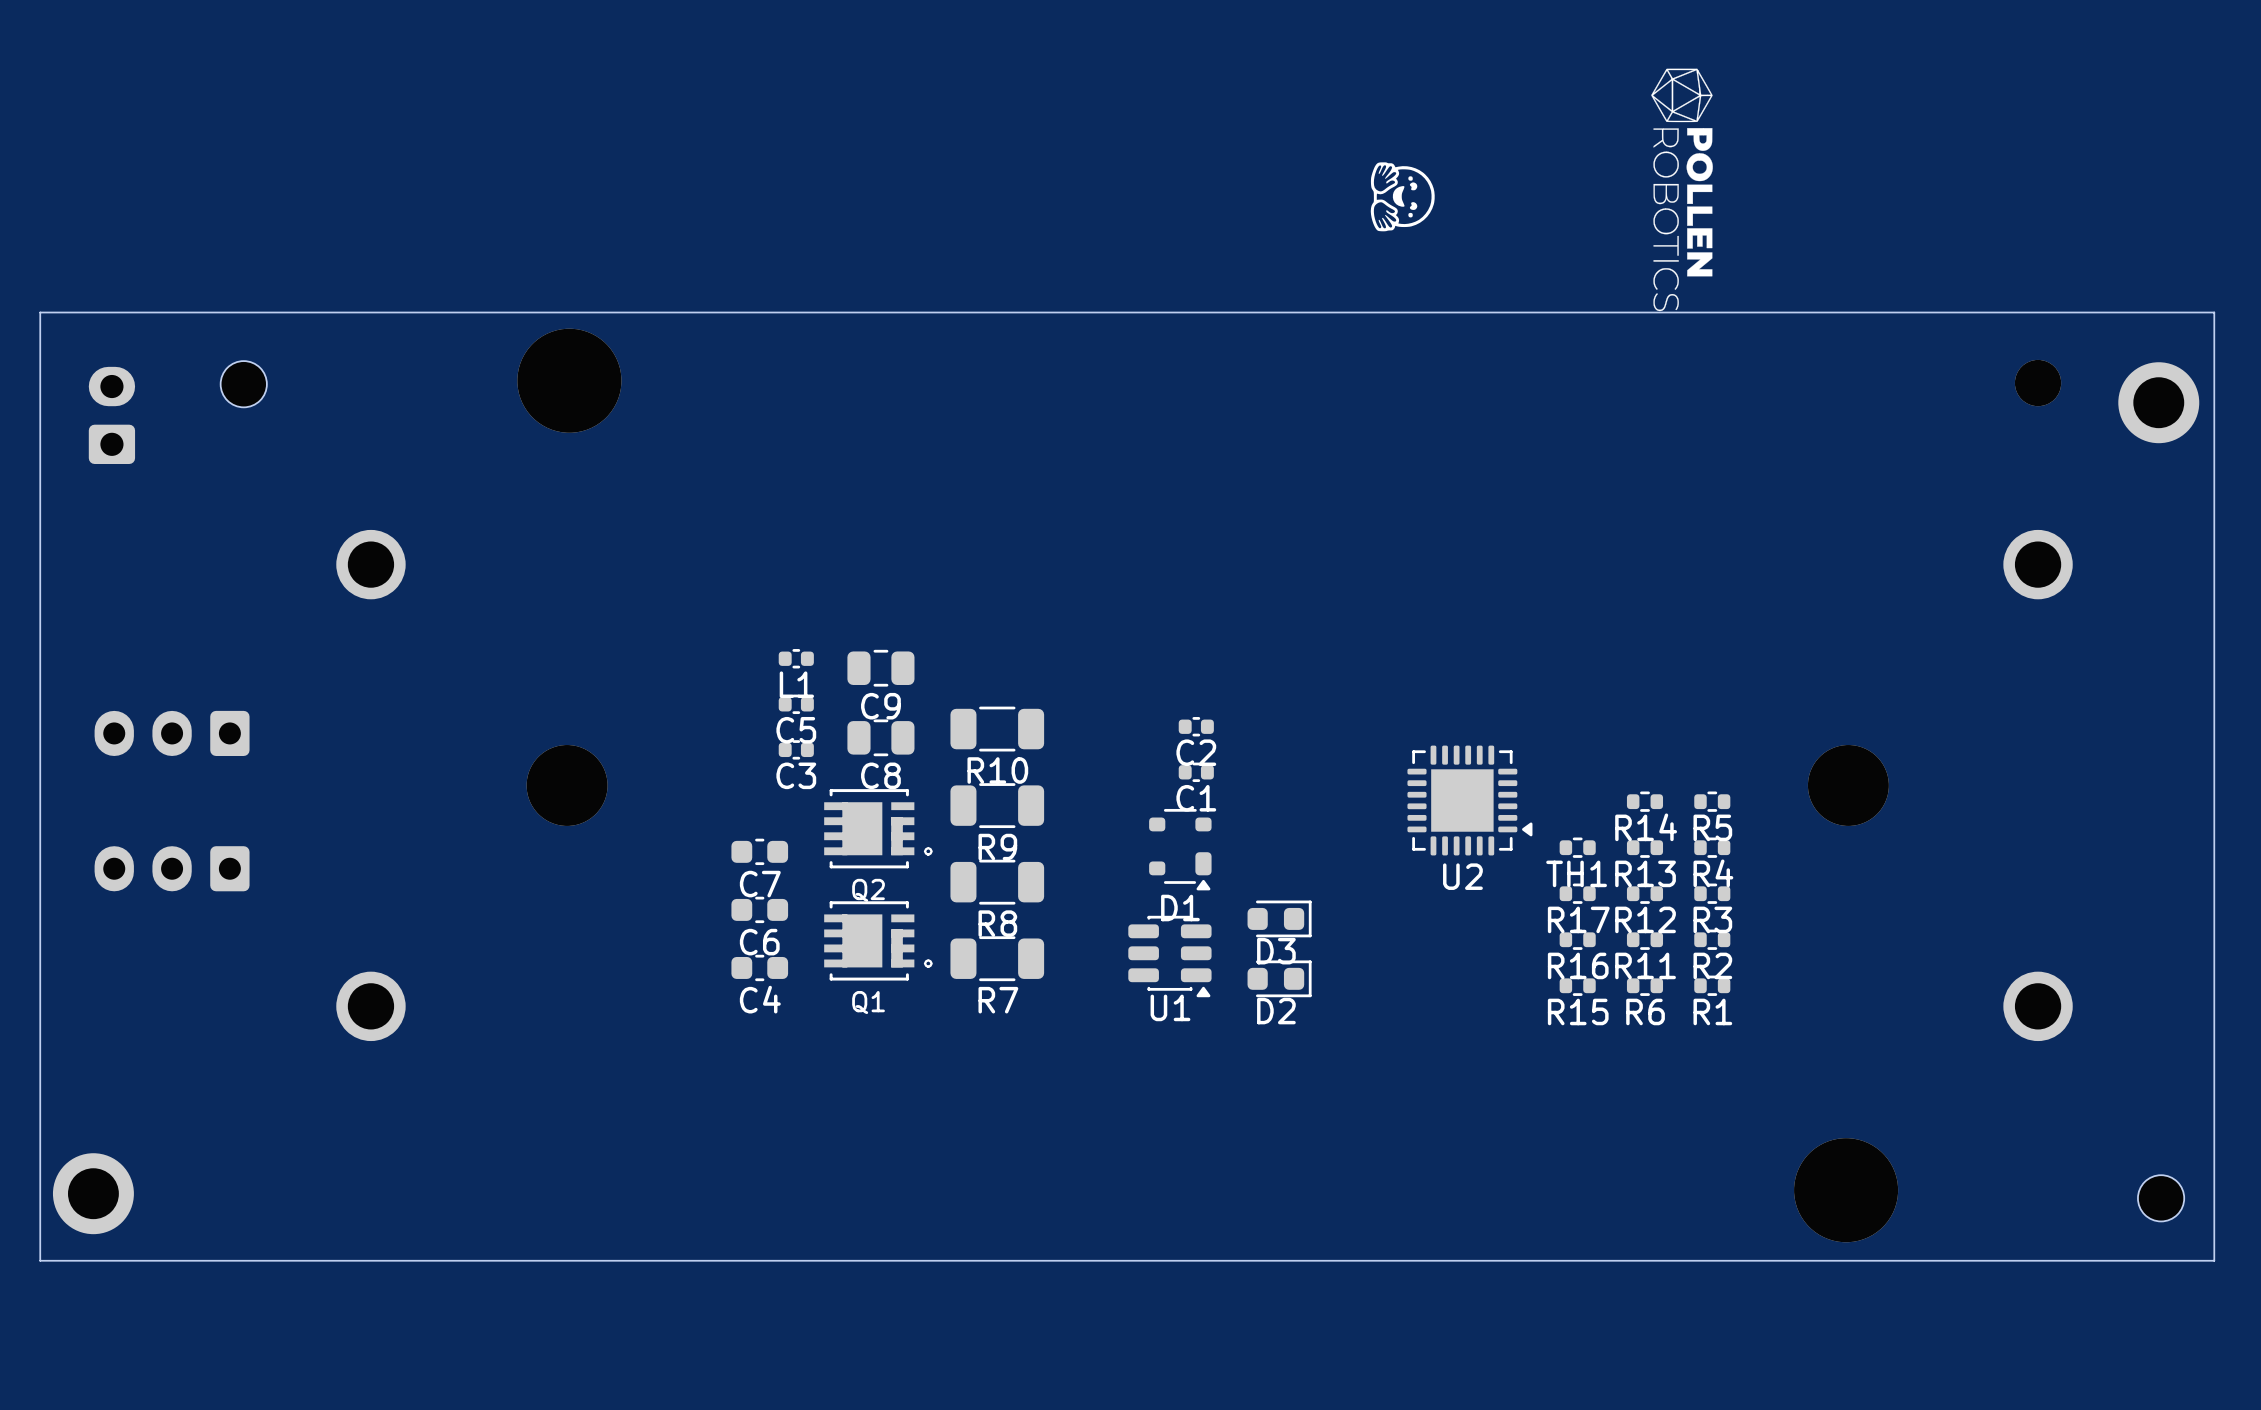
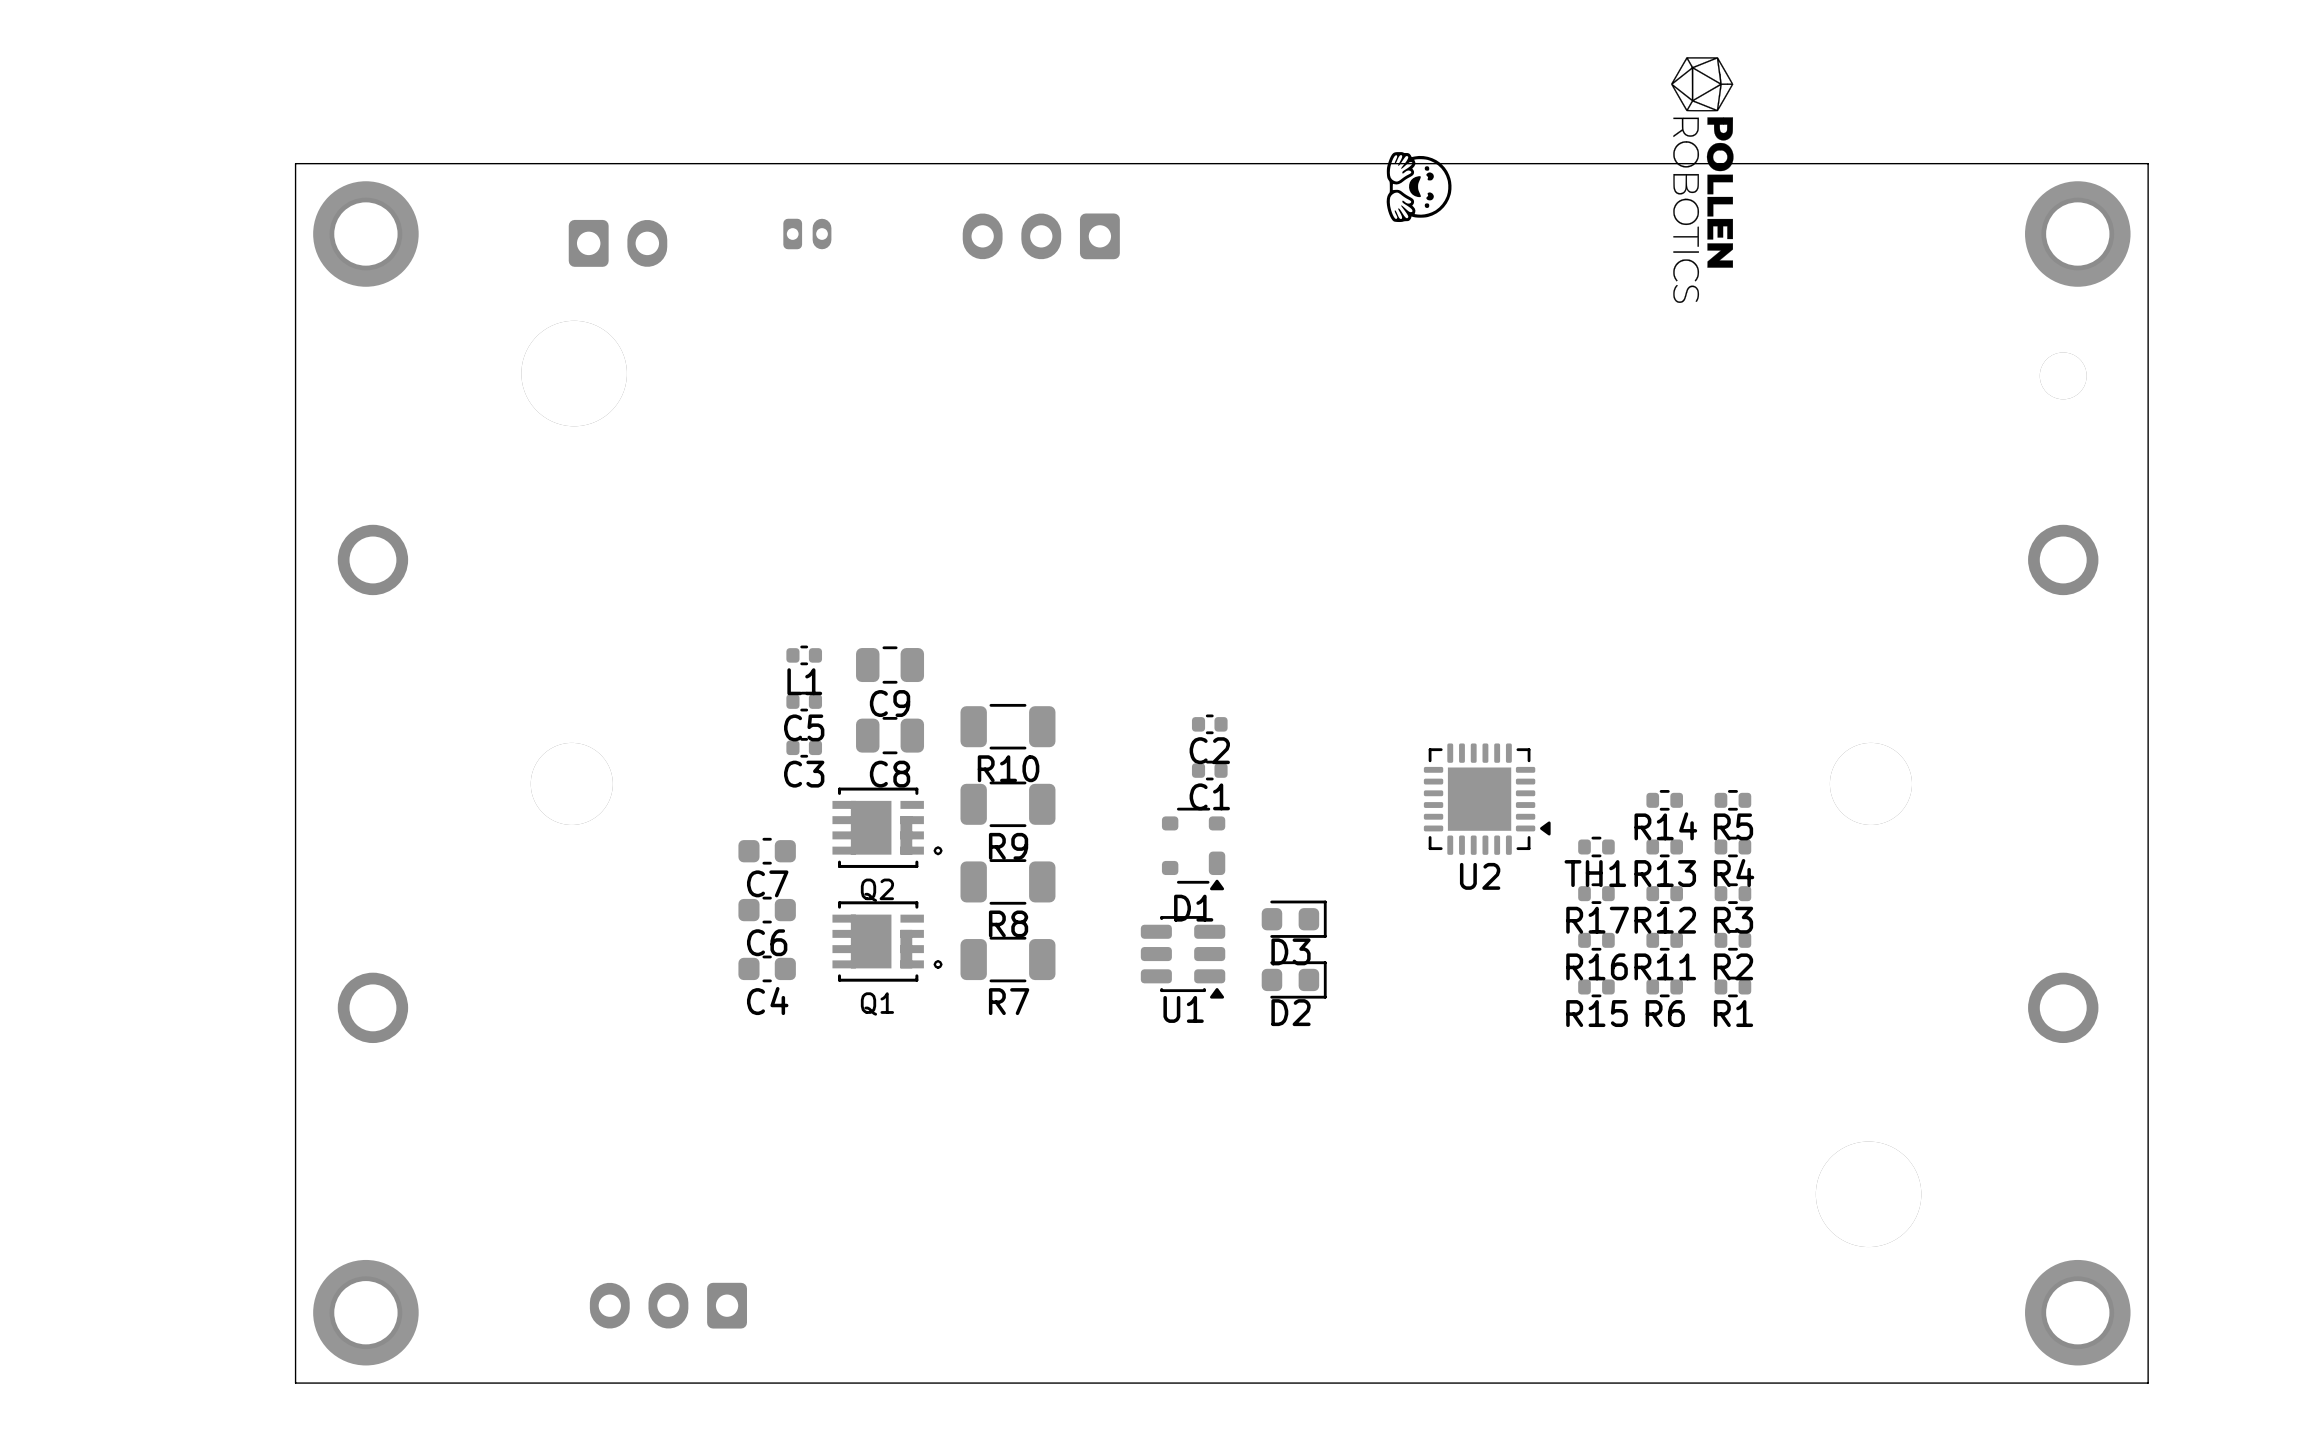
part: none -> (365, 234)
part: none -> (807, 234)
part: none -> (2077, 234)
part: none -> (1041, 236)
board edge: (2214, 312) (40, 312) (40, 1260) (2214, 1260) (2214, 312) -> (2148, 163) (2148, 1383) (295, 1383) (295, 163) (2148, 163)
part: (243, 384) -> none
part: (2158, 402) -> none
part rotation: 0° (111, 415) -> 90° clockwise (618, 243)
part position: (111, 415) -> (618, 243)
part: (172, 733) -> none
part: (172, 868) -> none
part: (93, 1193) -> none
part: (2161, 1198) -> none
part: none -> (668, 1305)
part: none -> (365, 1312)
part: none -> (2077, 1312)

